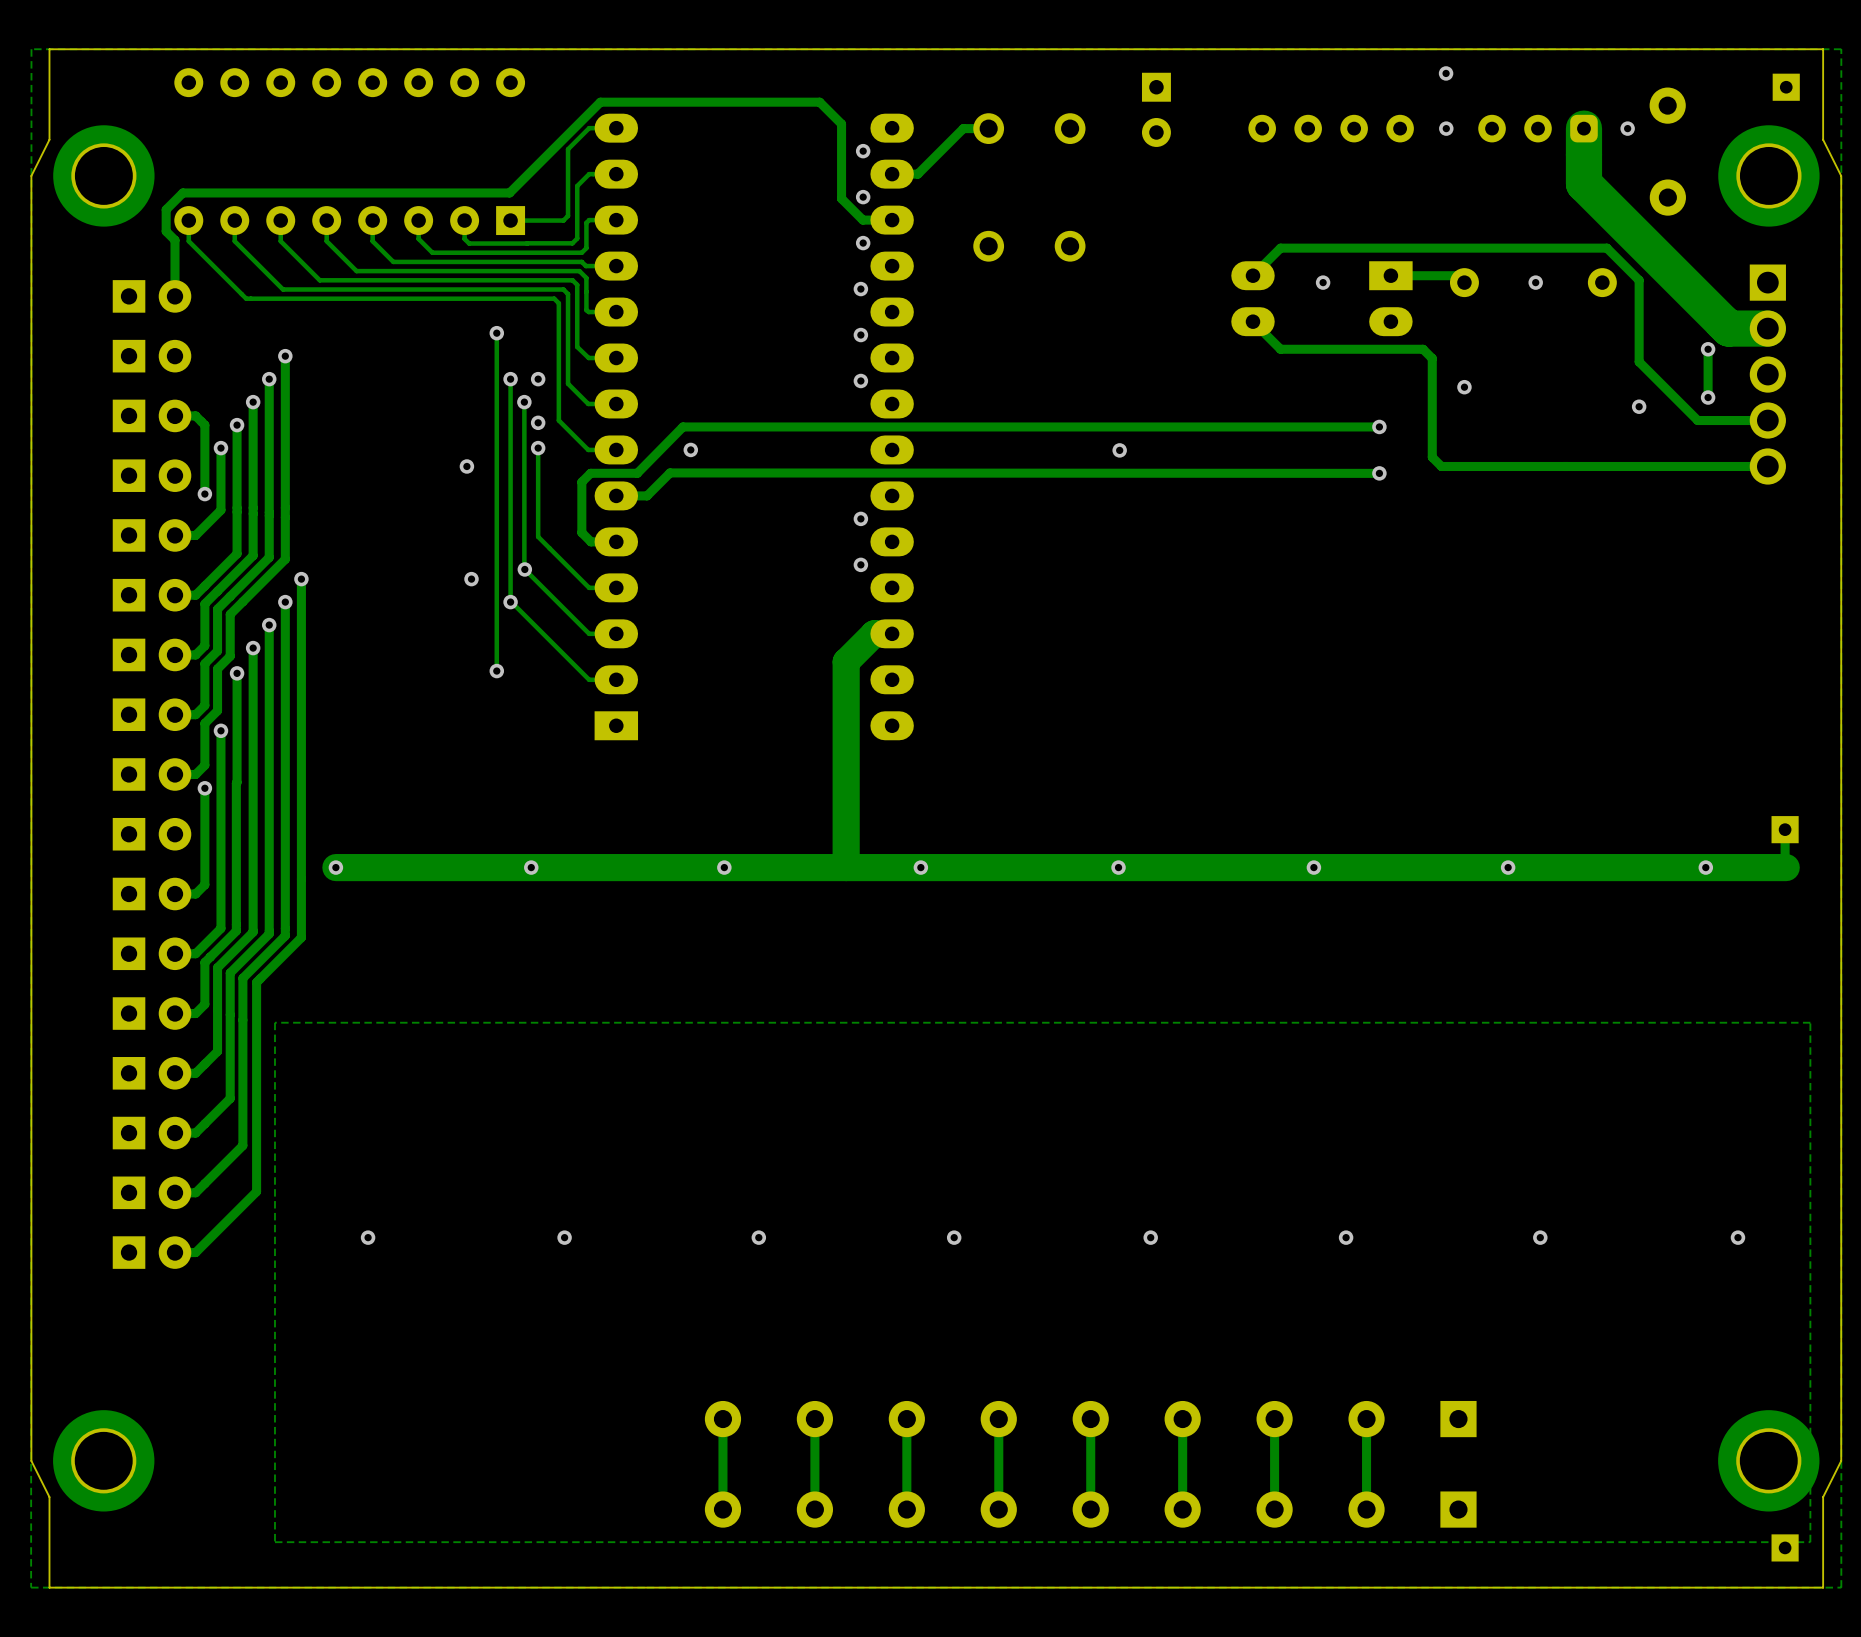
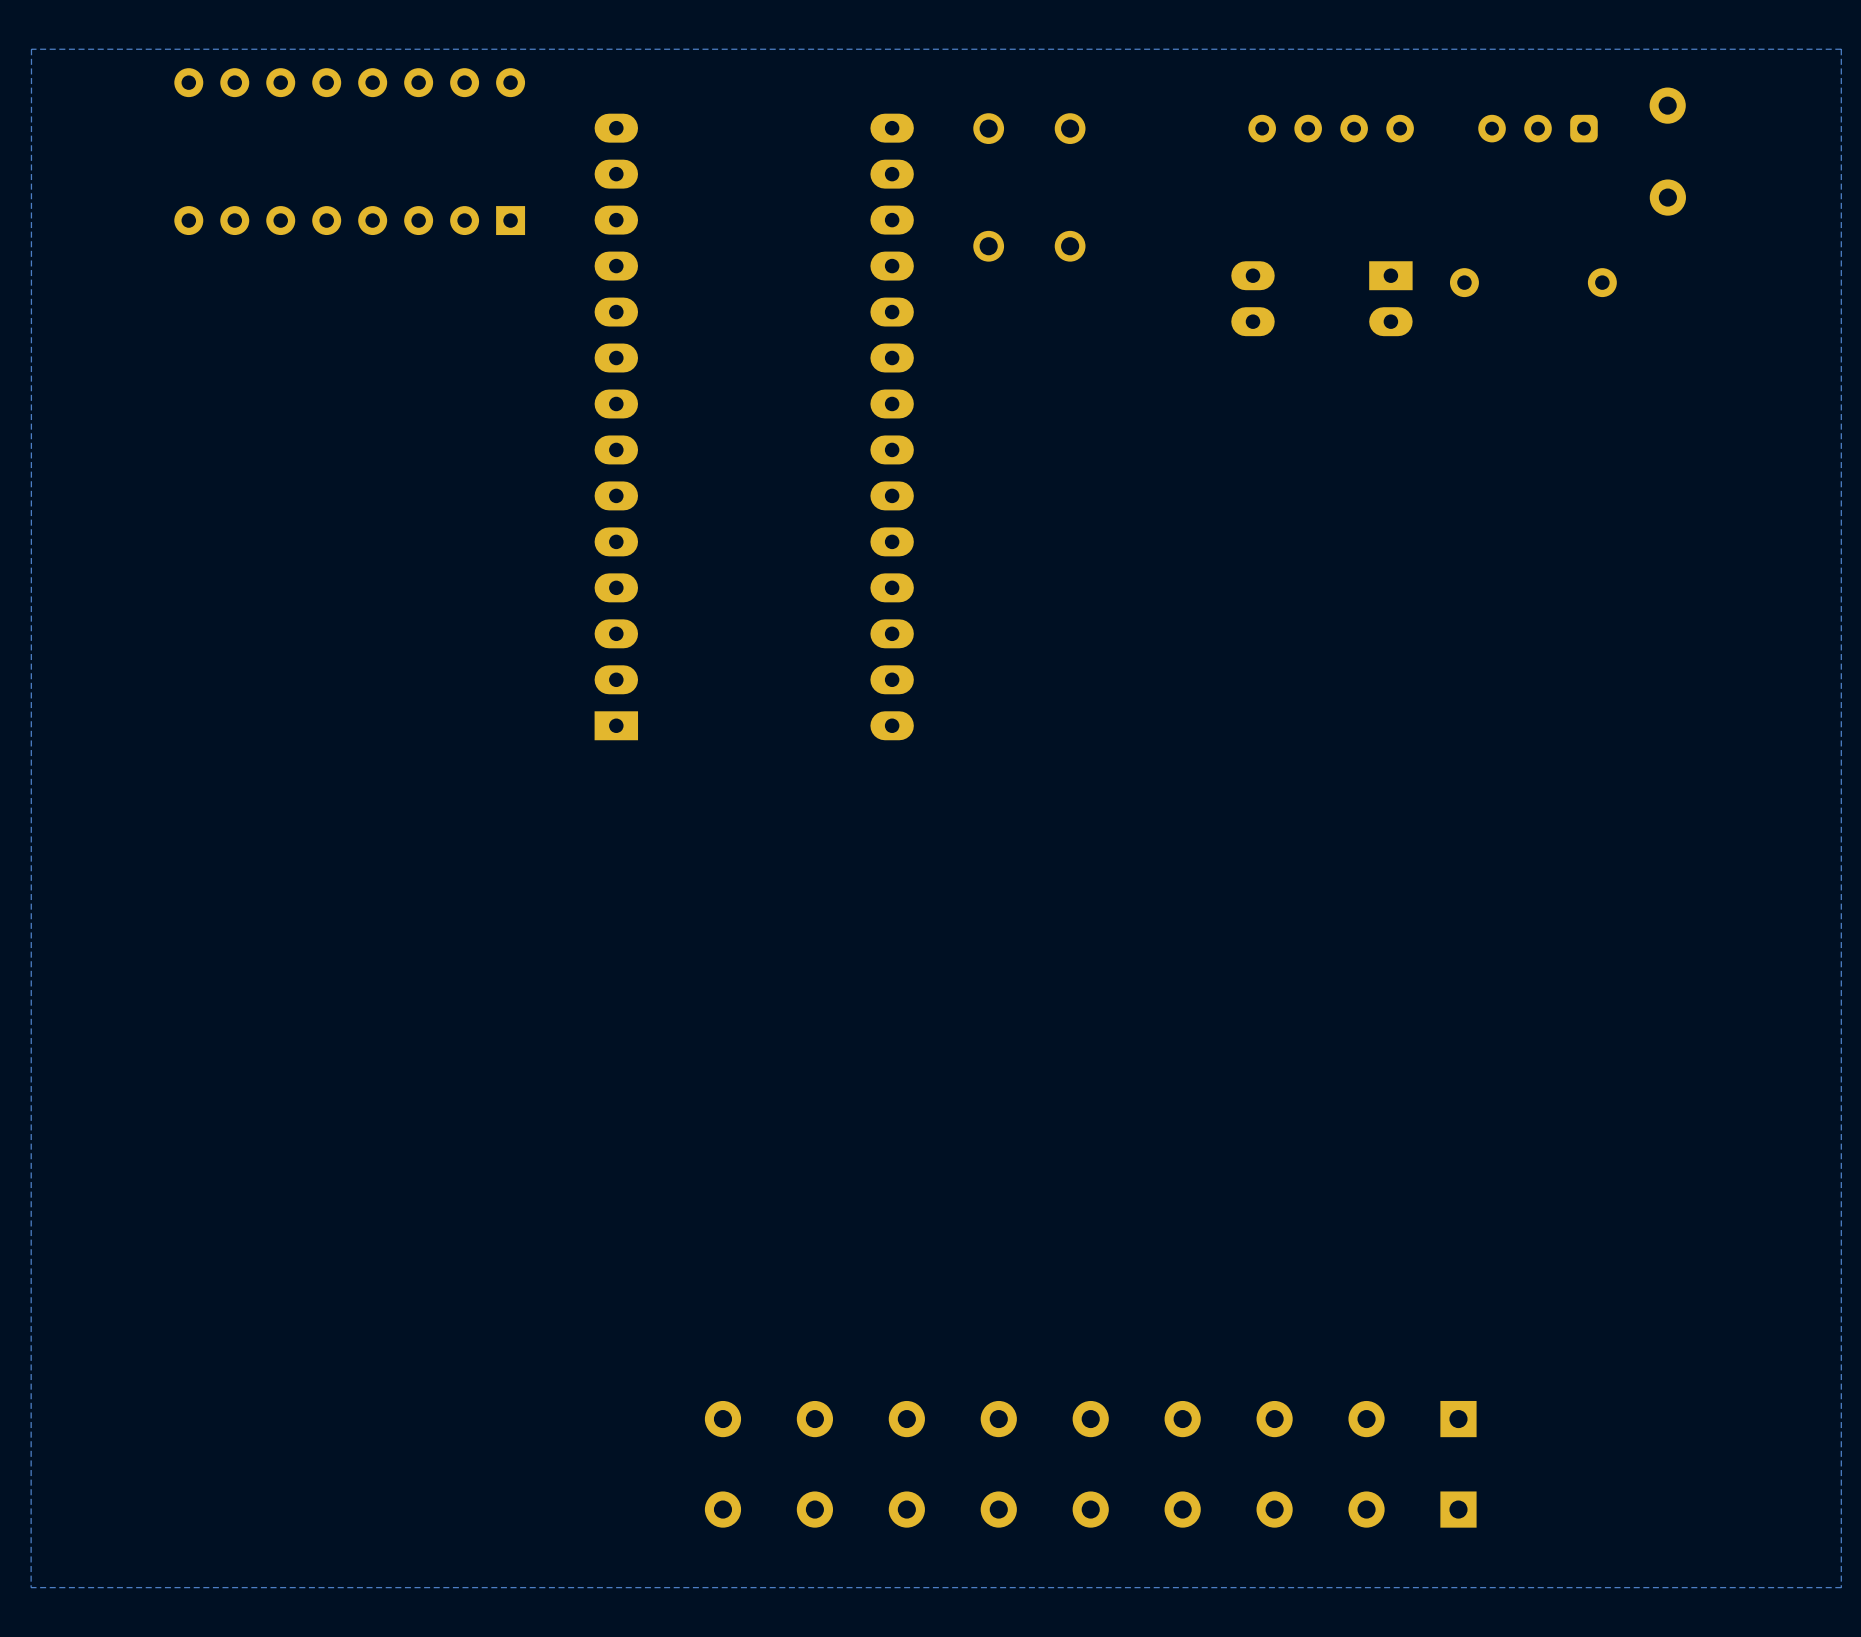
board edge: (1823, 49) (1823, 139) (1841, 175) (1841, 1460) (1823, 1497) (1823, 1587) (49, 1587) (49, 1497) (31, 1460) (31, 175) (49, 139) (49, 49) (1823, 49) -> none
via: (1446, 73) -> none
part: (1786, 87) -> none
part: (1156, 109) -> none
track: (988, 128) (963, 128) (917, 174) (892, 174) -> none
via: (1446, 128) -> none
track: (1583, 128) (1583, 183) (1728, 328) (1767, 328) -> none
via: (1627, 128) -> none
track: (616, 129) (616, 128) (589, 128) (568, 149) (568, 215) (563, 220) (510, 220) -> none
via: (863, 151) -> none
track: (616, 174) (589, 174) (577, 186) (577, 238) (572, 243) (527, 243) -> none
part: (103, 175) -> none
part: (1768, 175) -> none
via: (863, 197) -> none
track: (188, 220) (188, 241) (246, 298) (554, 298) (558, 303) (558, 420) (588, 449) (616, 449) -> none
track: (234, 220) (234, 241) (283, 289) (563, 289) (568, 294) (568, 383) (588, 403) (616, 403) -> none
track: (280, 220) (280, 241) (319, 280) (572, 280) (577, 284) (577, 346) (588, 358) (616, 358) -> none
track: (326, 220) (326, 241) (356, 271) (579, 271) (586, 278) (586, 310) (588, 312) (616, 312) (614, 313) -> none
track: (372, 220) (372, 241) (393, 261) (581, 261) (585, 266) (616, 266) -> none
track: (464, 220) (464, 238) (469, 243) (527, 243) -> none
track: (616, 220) (589, 220) (586, 222) (586, 248) (581, 252) (432, 252) (418, 238) (418, 220) -> none
track: (892, 220) (862, 220) (841, 198) (841, 124) (819, 102) (600, 102) (509, 192) (182, 192) (166, 209) (166, 231) (175, 240) (175, 296) -> none
via: (863, 243) -> none
track: (1252, 275) (1280, 248) (1606, 248) (1639, 280) (1639, 361) (1697, 420) (1767, 420) -> none
track: (1390, 275) (1457, 275) (1464, 282) -> none
via: (1323, 282) -> none
via: (1535, 282) -> none
via: (860, 289) -> none
part: (152, 296) -> none
track: (1252, 321) (1280, 349) (1423, 349) (1432, 358) (1432, 457) (1441, 466) (1767, 466) -> none
track: (496, 333) (496, 671) -> none
via: (496, 333) -> none
via: (860, 335) -> none
track: (1708, 349) (1708, 397) -> none
via: (1708, 349) -> none
part: (152, 356) -> none
track: (285, 356) (285, 559) (230, 614) (230, 656) (217, 668) (217, 710) (204, 723) (204, 765) (195, 774) (175, 774) -> none
via: (285, 356) -> none
part: (1767, 374) -> none
track: (269, 379) (269, 557) (217, 609) (217, 651) (204, 663) (204, 705) (195, 714) (175, 714) -> none
via: (269, 379) -> none
track: (510, 379) (510, 602) -> none
via: (510, 379) -> none
via: (538, 379) -> none
via: (860, 380) -> none
via: (1464, 387) -> none
via: (1708, 397) -> none
track: (253, 402) (253, 555) (204, 603) (204, 645) (195, 654) (175, 654) -> none
via: (253, 402) -> none
track: (524, 402) (524, 569) (589, 633) (616, 633) -> none
via: (524, 402) -> none
via: (1639, 406) -> none
part: (152, 415) -> none
track: (175, 415) (195, 415) (204, 425) (204, 494) -> none
via: (538, 422) -> none
track: (237, 425) (237, 553) (195, 595) (175, 595) -> none
via: (237, 425) -> none
track: (1379, 426) (682, 426) (637, 473) (590, 473) (581, 482) (581, 532) (591, 541) (616, 541) -> none
via: (1379, 426) -> none
track: (220, 448) (220, 510) (195, 535) (175, 535) -> none
via: (220, 448) -> none
track: (538, 448) (538, 536) (589, 587) (616, 587) -> none
via: (538, 448) -> none
via: (690, 449) -> none
via: (1119, 450) -> none
via: (466, 466) -> none
track: (1379, 473) (670, 472) (647, 495) (616, 495) -> none
via: (1379, 473) -> none
part: (152, 475) -> none
via: (204, 494) -> none
via: (860, 518) -> none
part: (152, 535) -> none
via: (860, 564) -> none
via: (524, 569) -> none
track: (301, 579) (301, 937) (256, 982) (256, 1191) (195, 1252) (175, 1252) -> none
via: (301, 579) -> none
via: (471, 579) -> none
part: (152, 595) -> none
track: (510, 601) (589, 679) (616, 679) -> none
track: (285, 602) (285, 935) (242, 978) (242, 1145) (195, 1192) (175, 1192) -> none
via: (285, 602) -> none
via: (510, 602) -> none
track: (269, 625) (269, 933) (230, 972) (230, 1098) (195, 1133) (175, 1133) -> none
via: (269, 625) -> none
track: (892, 633) (874, 633) (846, 661) (846, 867) -> none
track: (253, 648) (253, 932) (217, 967) (217, 1051) (195, 1073) (175, 1073) -> none
via: (253, 648) -> none
part: (152, 654) -> none
via: (496, 671) -> none
track: (237, 673) (236, 931) (204, 962) (204, 1004) (195, 1013) (175, 1013) -> none
via: (237, 673) -> none
part: (152, 714) -> none
track: (220, 730) (220, 928) (195, 953) (175, 953) -> none
via: (220, 730) -> none
part: (152, 774) -> none
track: (204, 788) (204, 884) (195, 894) (175, 894) -> none
via: (204, 788) -> none
track: (1785, 829) (1786, 867) (335, 867) -> none
part: (1785, 829) -> none
part: (152, 834) -> none
via: (335, 867) -> none
via: (531, 867) -> none
via: (724, 867) -> none
via: (920, 867) -> none
via: (1118, 867) -> none
via: (1313, 867) -> none
via: (1508, 867) -> none
via: (1705, 867) -> none
part: (152, 894) -> none
part: (152, 953) -> none
part: (152, 1013) -> none
zone outline: (1810, 1022) (1810, 1542) (274, 1542) (274, 1022) (1810, 1022) -> none
part: (152, 1073) -> none
part: (152, 1133) -> none
part: (152, 1192) -> none
via: (368, 1237) -> none
via: (564, 1237) -> none
via: (758, 1237) -> none
via: (954, 1237) -> none
via: (1150, 1237) -> none
via: (1346, 1237) -> none
via: (1540, 1237) -> none
via: (1737, 1237) -> none
part: (152, 1252) -> none
track: (722, 1419) (722, 1509) -> none
track: (814, 1419) (814, 1509) -> none
track: (906, 1419) (906, 1509) -> none
track: (998, 1419) (998, 1509) -> none
track: (1090, 1419) (1090, 1509) -> none
track: (1182, 1419) (1182, 1509) -> none
track: (1274, 1419) (1274, 1509) -> none
track: (1366, 1419) (1366, 1509) -> none
part: (103, 1460) -> none
part: (1768, 1460) -> none
part: (1785, 1547) -> none

